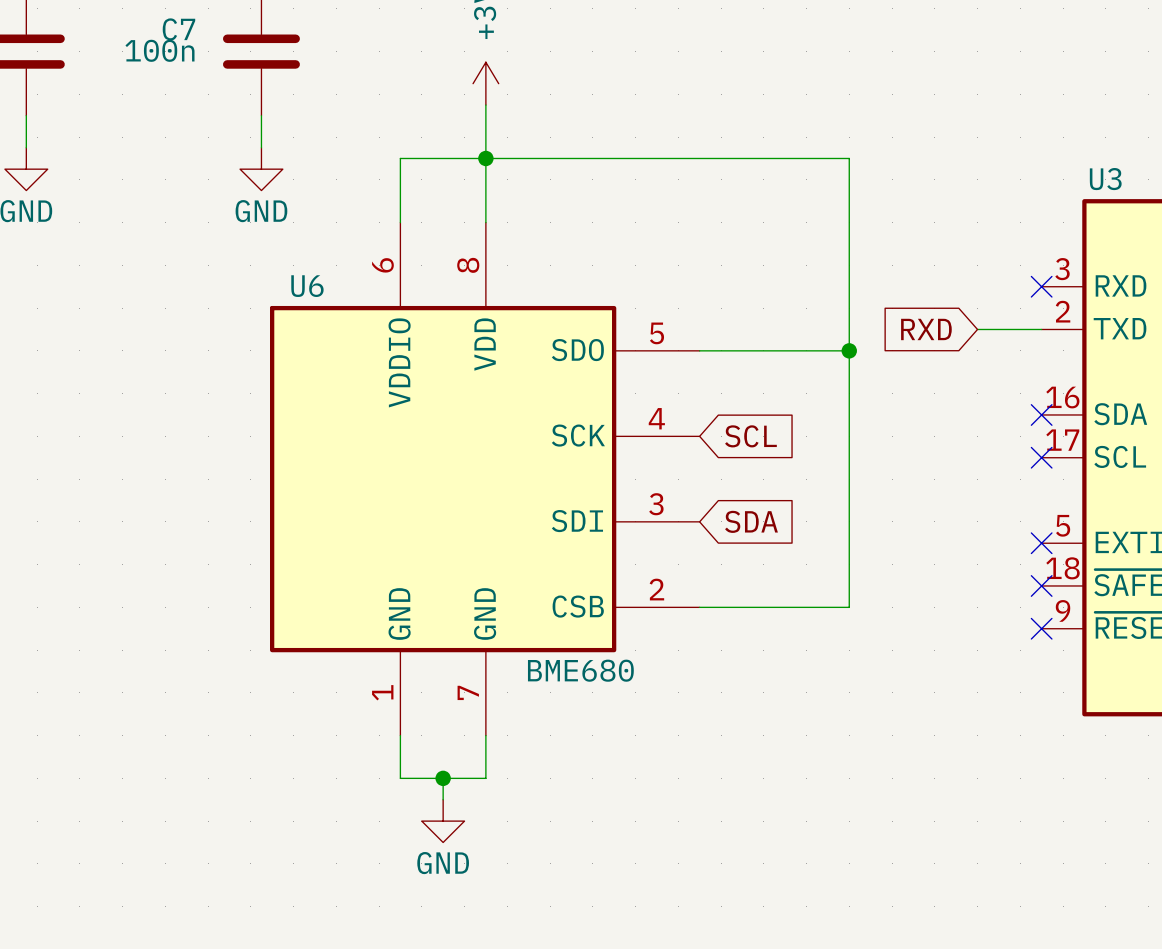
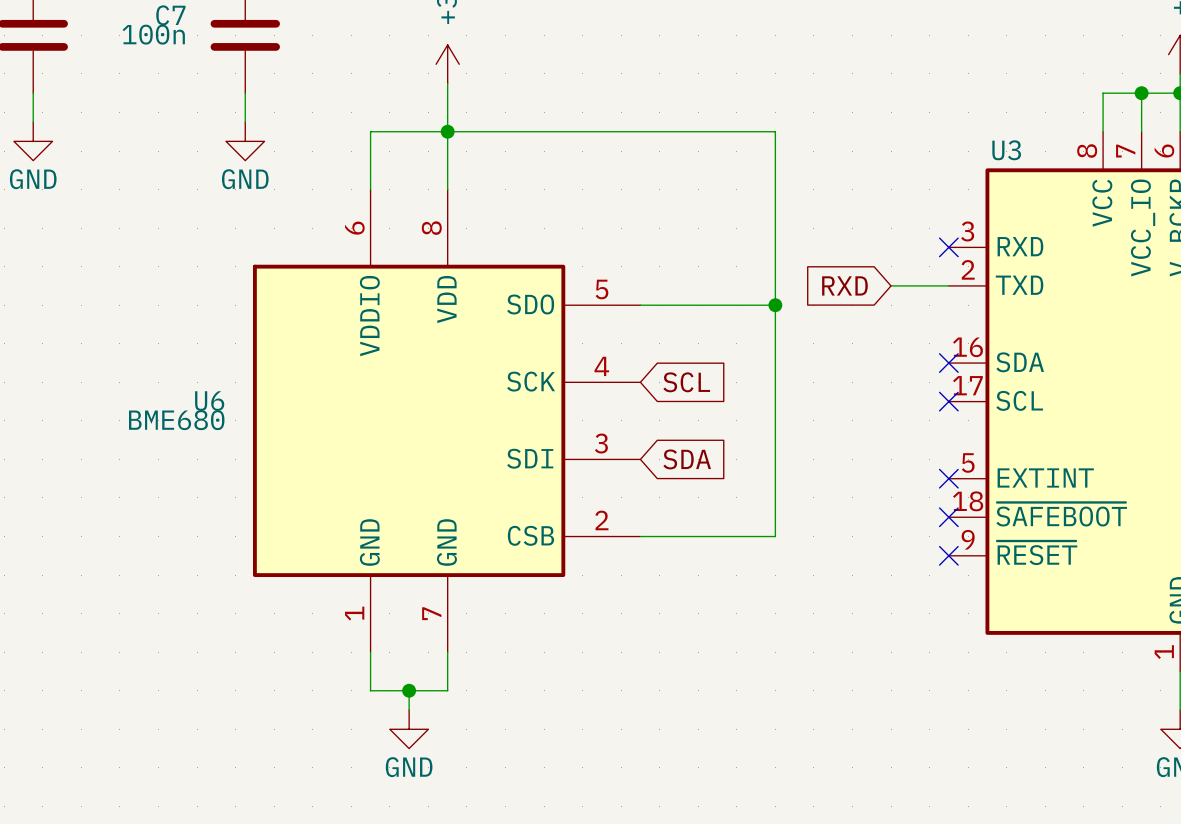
U6 name position: U6 (307, 286) -> U6 (209, 401)
U6 value position: BME680 (580, 670) -> BME680 (176, 420)

